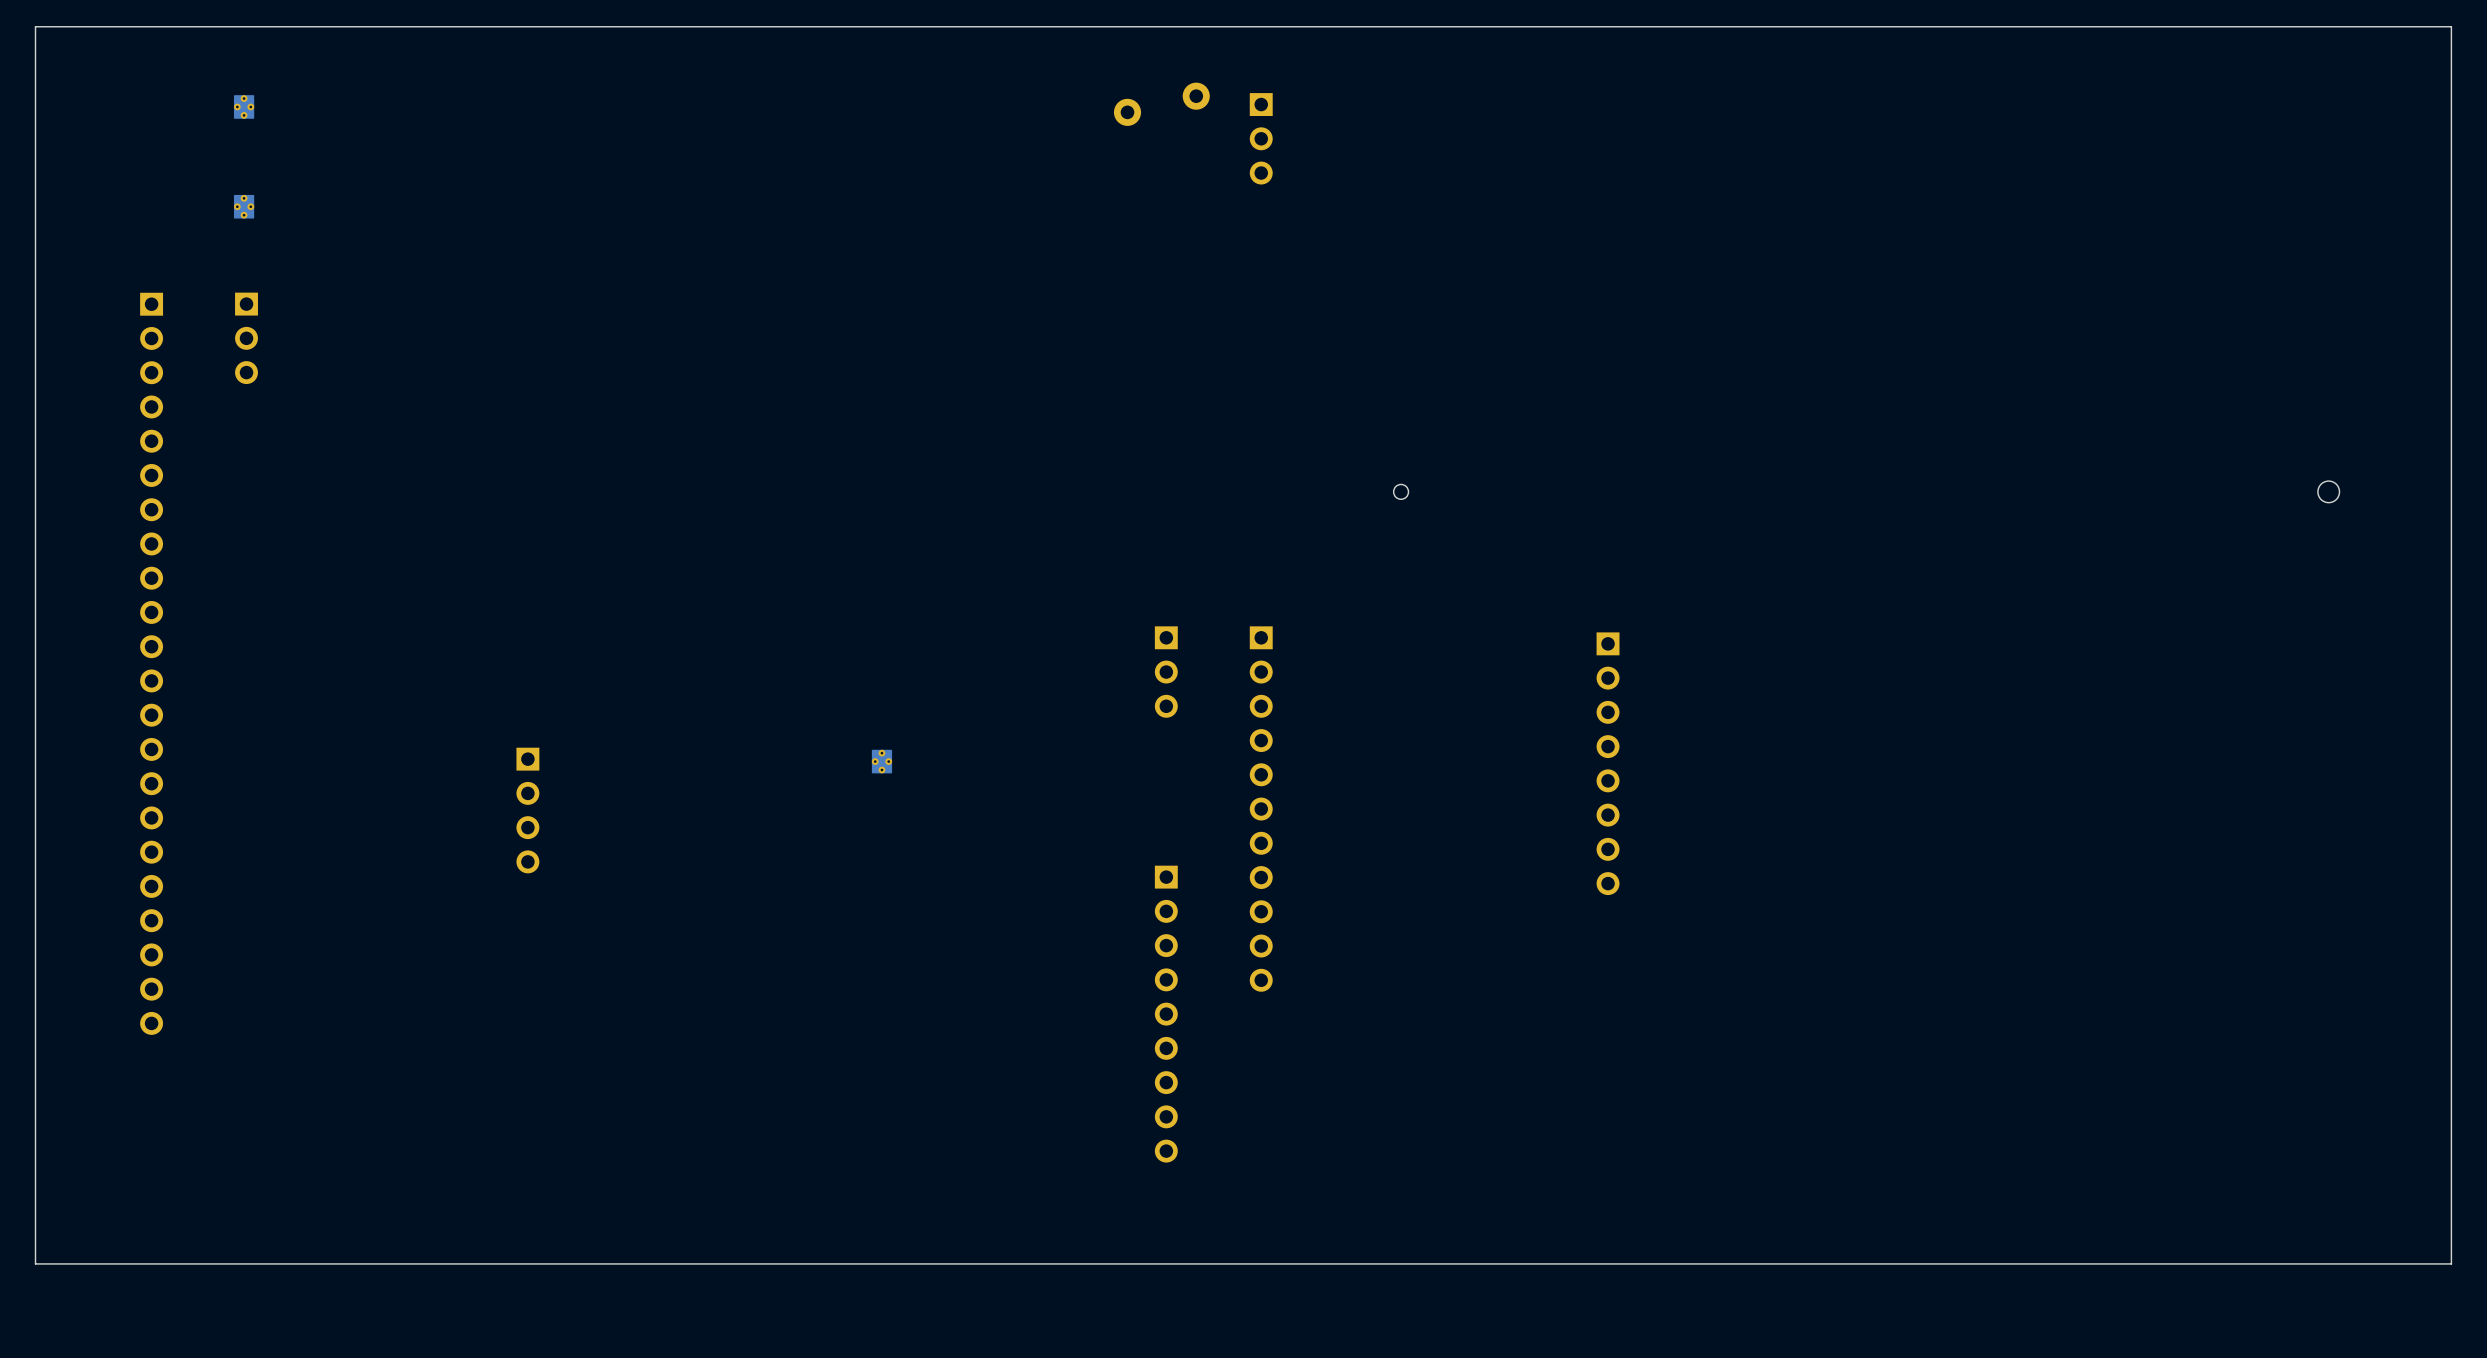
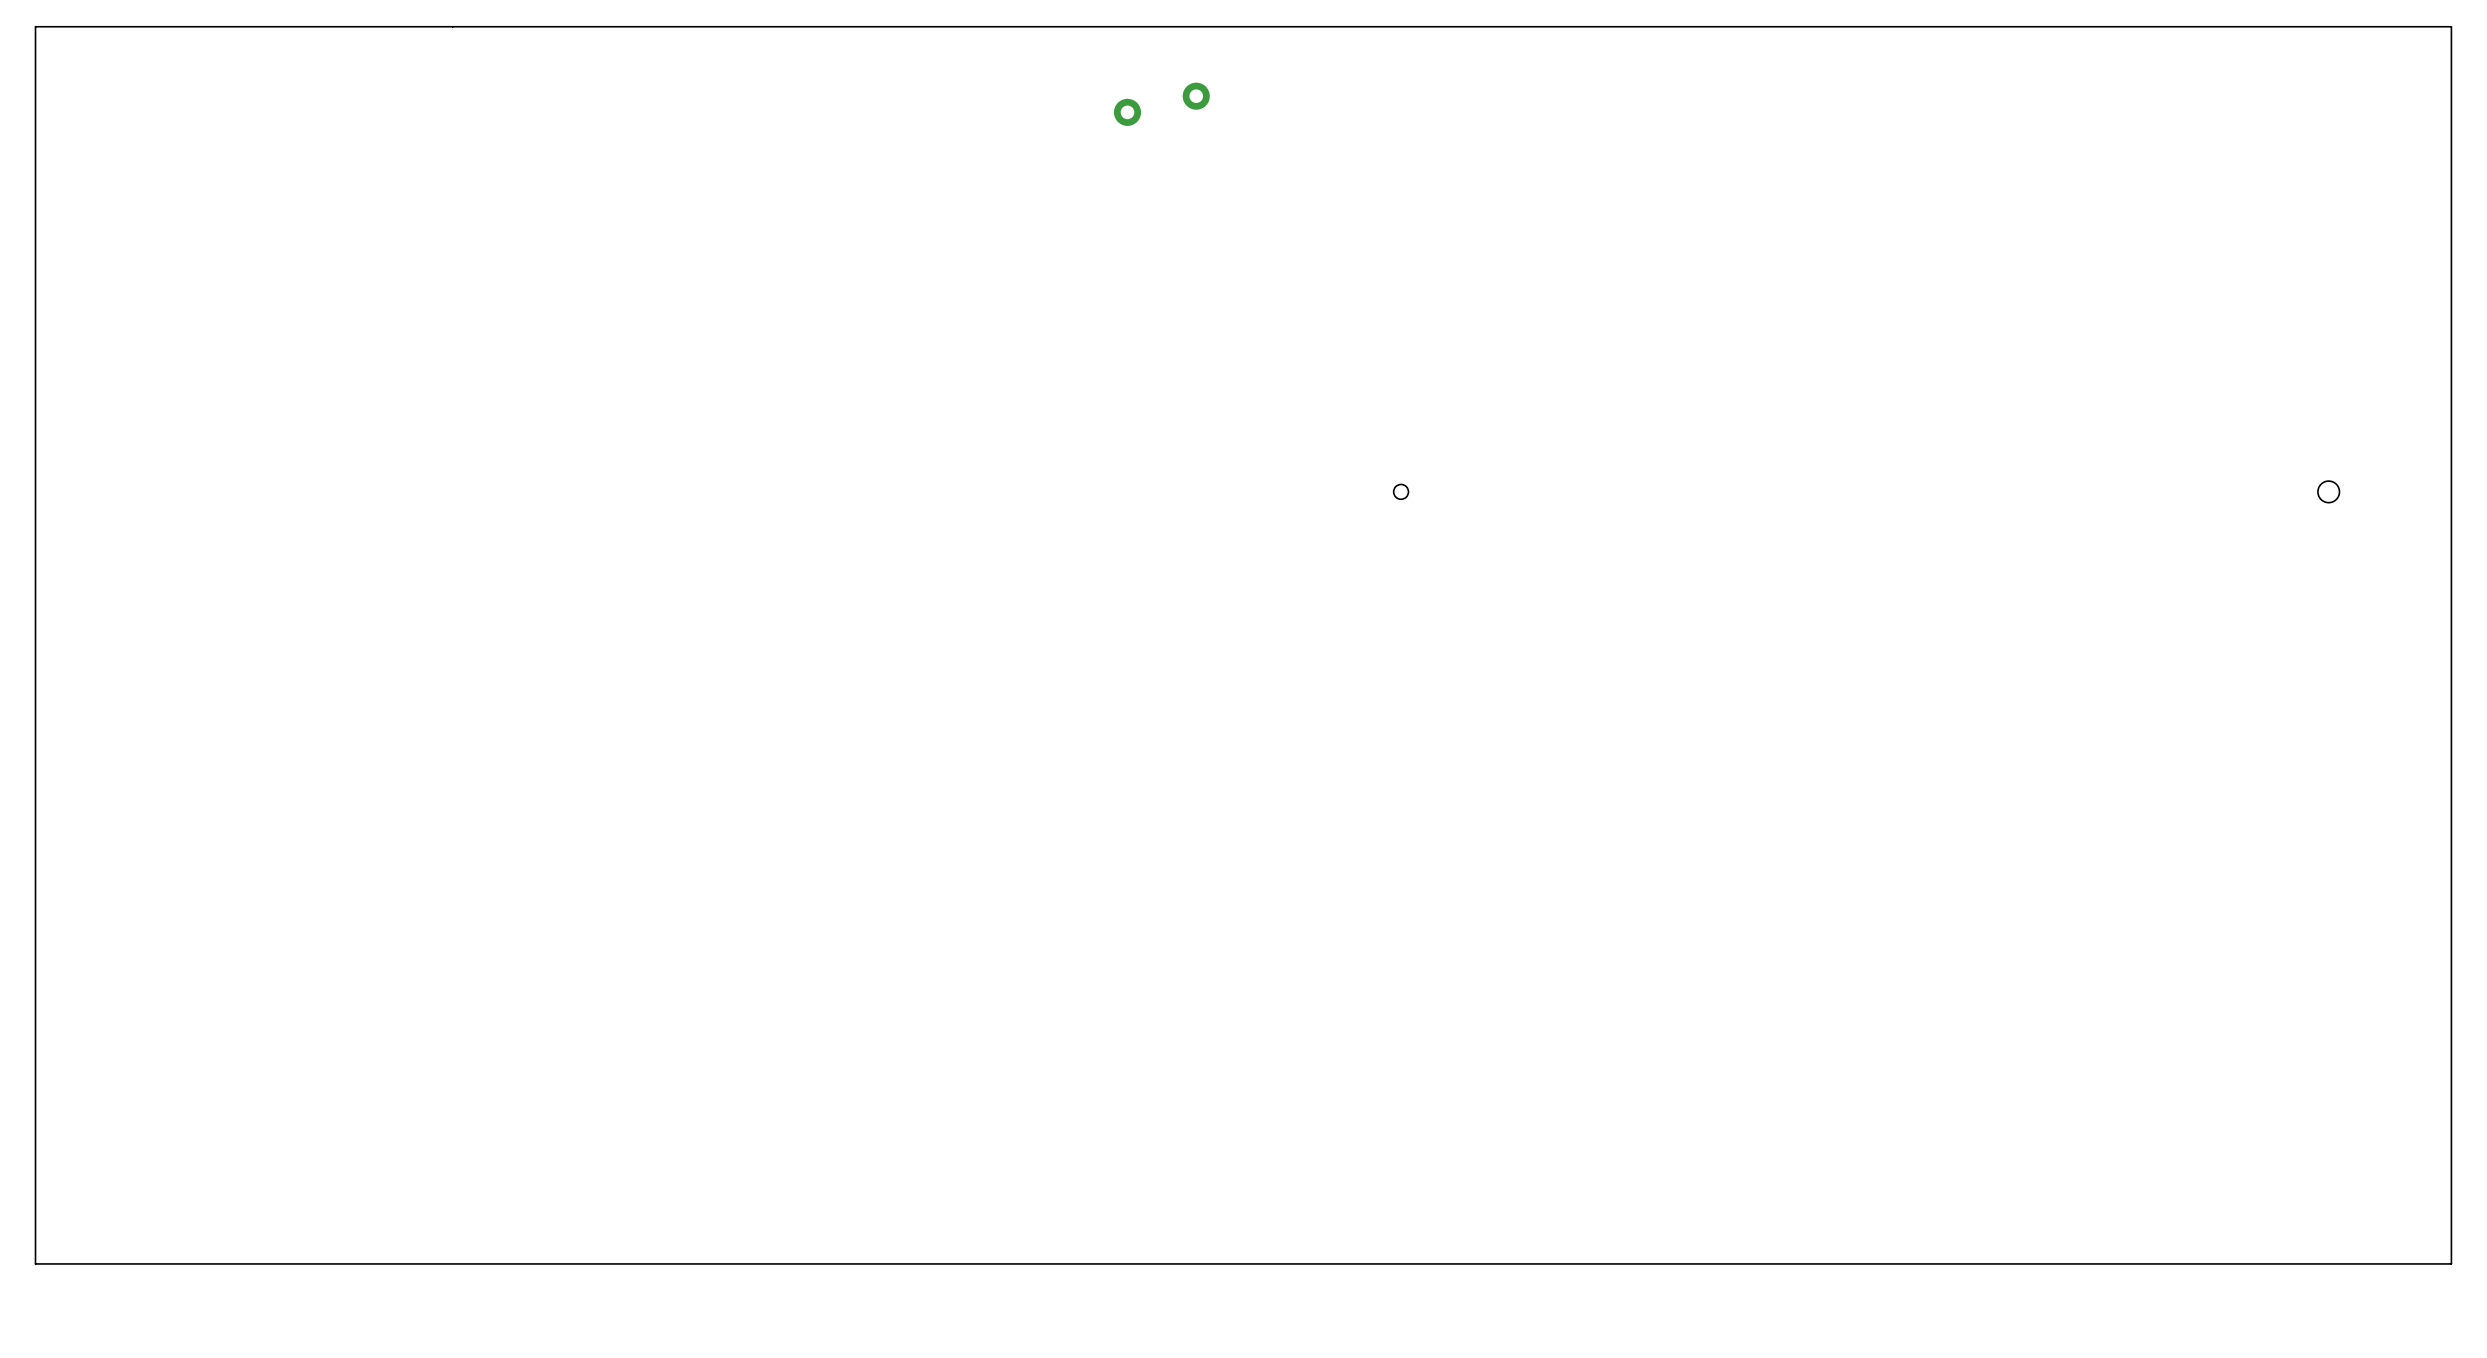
part: (244, 106) -> none
part: (1261, 138) -> none
part: (244, 206) -> none
part: (246, 338) -> none
part: (151, 663) -> none
part: (1166, 672) -> none
part: (881, 761) -> none
part: (1608, 763) -> none
part: (1261, 809) -> none
part: (527, 810) -> none
part: (1166, 1014) -> none

